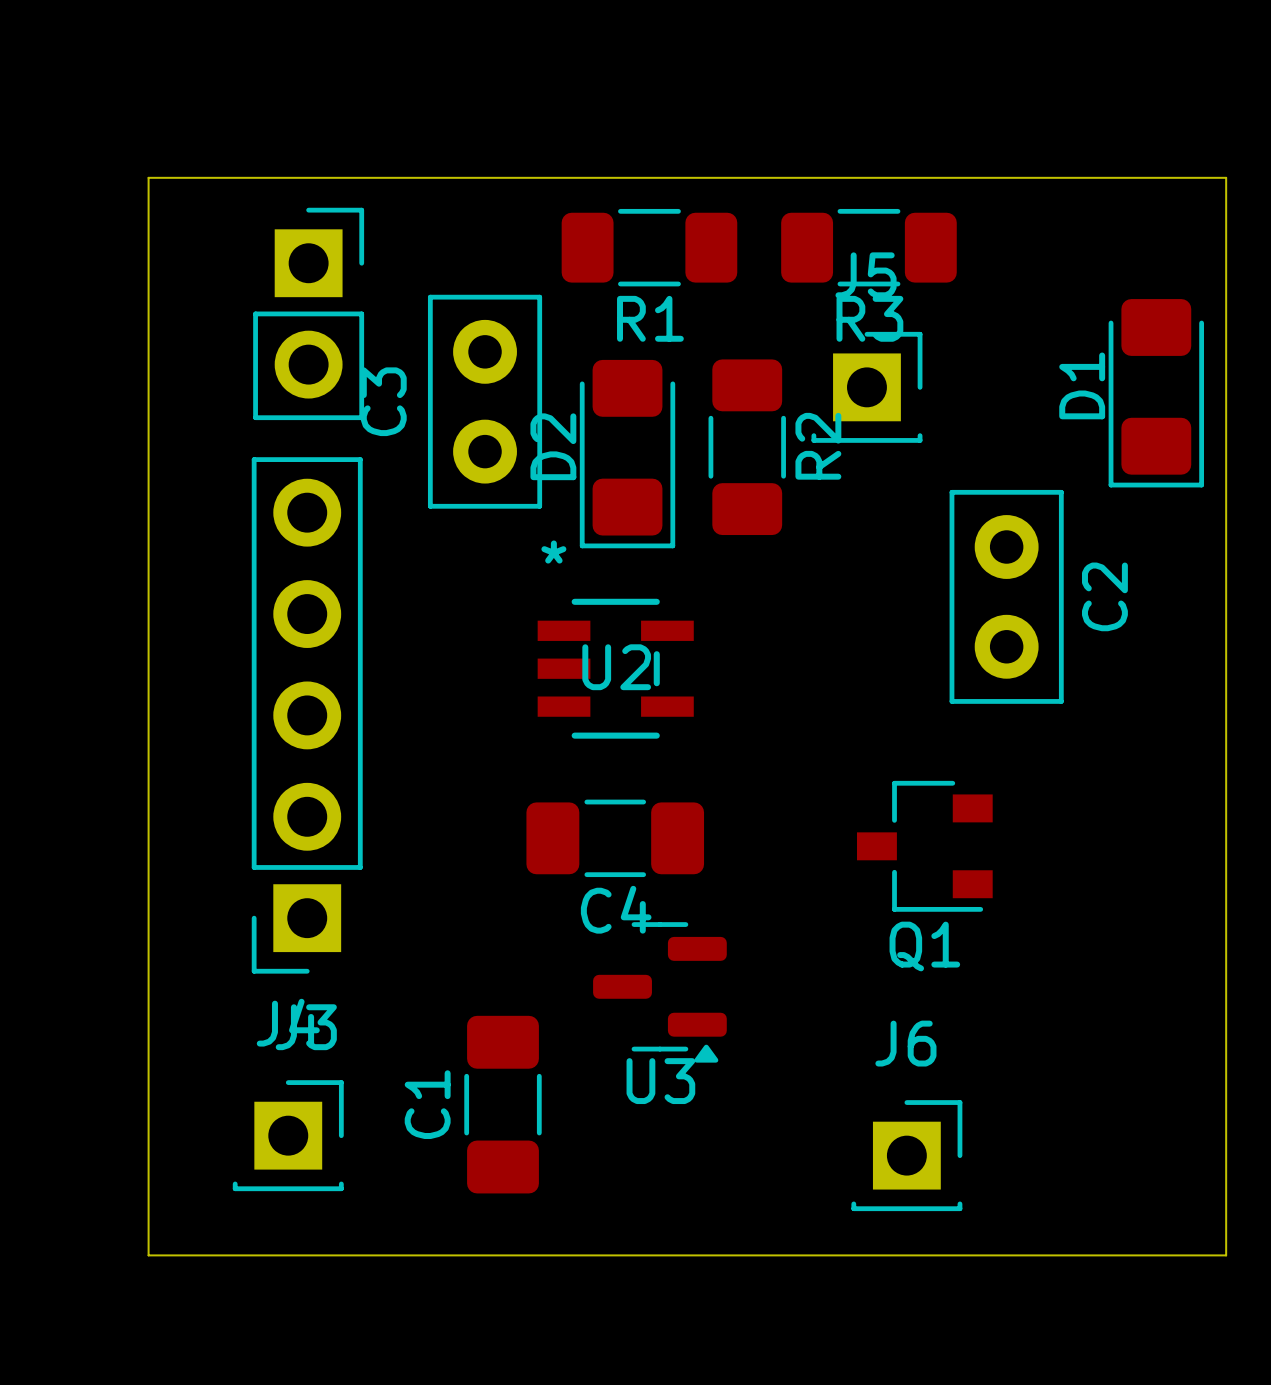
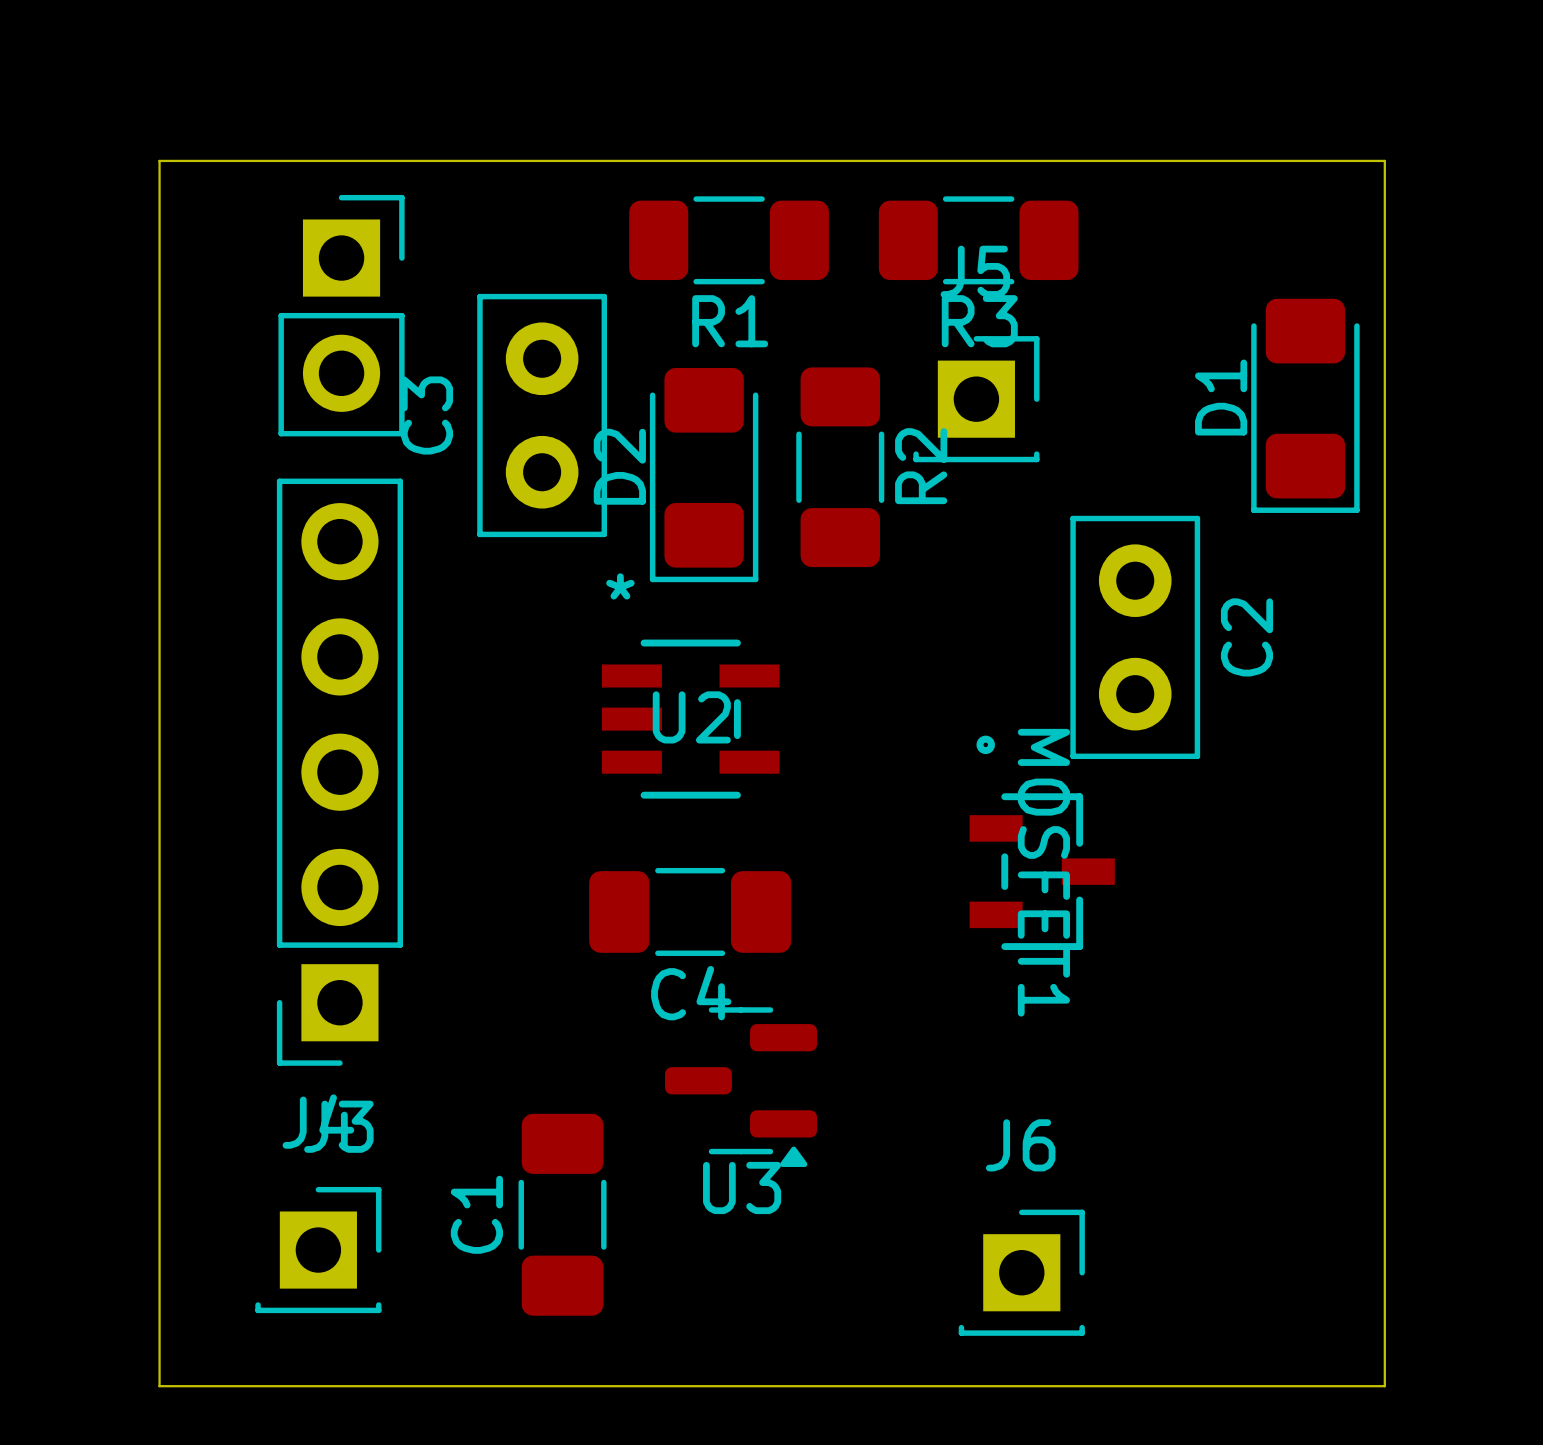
MOSFET1: none -> (1042, 842)
Q1: (924, 846) -> none

